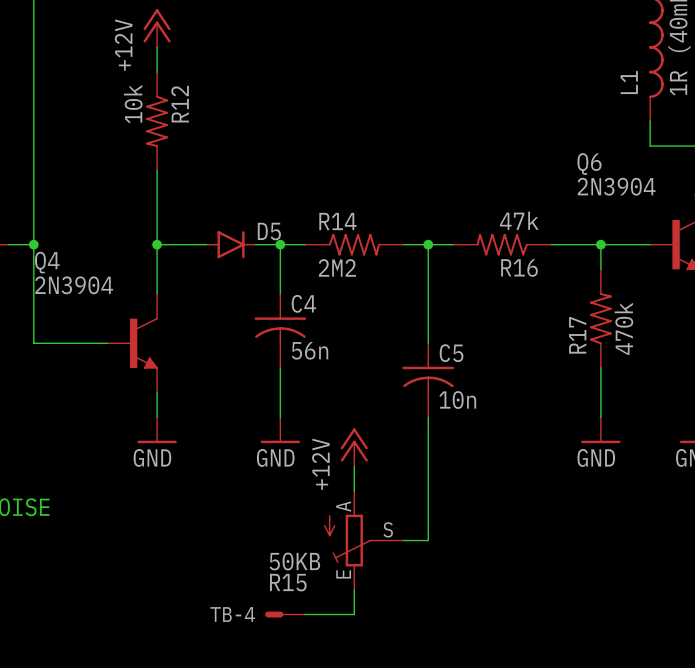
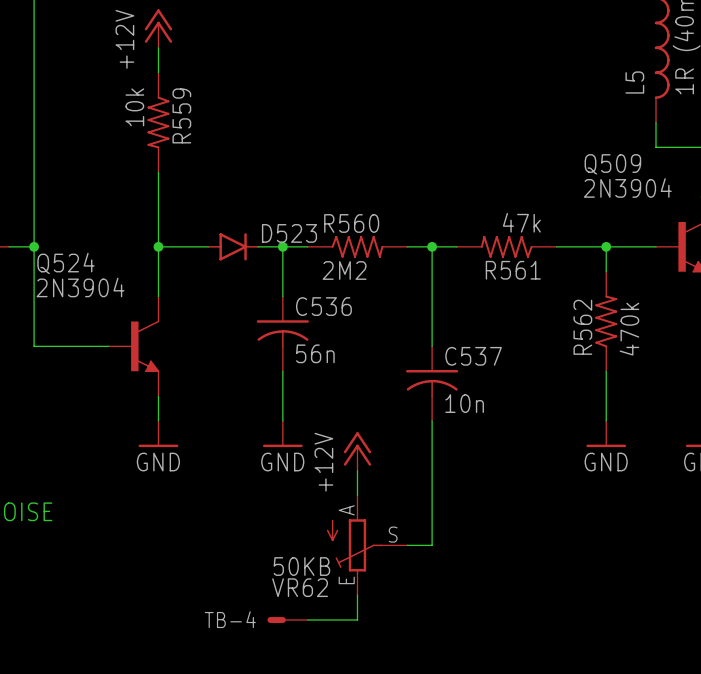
L1 name: L1 (629, 82) -> L5 (634, 82)
R12 name: R12 (180, 104) -> R559 (181, 115)
Q6 name: Q6 (589, 163) -> Q509 (612, 164)
R14 name: R14 (337, 221) -> R560 (351, 223)
D5 name: D5 (269, 231) -> D523 (289, 233)
Q4 name: Q4 (47, 262) -> Q524 (65, 263)
R16 name: R16 (519, 268) -> R561 (513, 270)
C4 name: C4 (303, 303) -> C536 (323, 306)
R17 name: R17 (577, 335) -> R562 (582, 327)
C5 name: C5 (451, 353) -> C537 (473, 356)
R15 name: R15 (288, 582) -> VR62 (300, 587)

